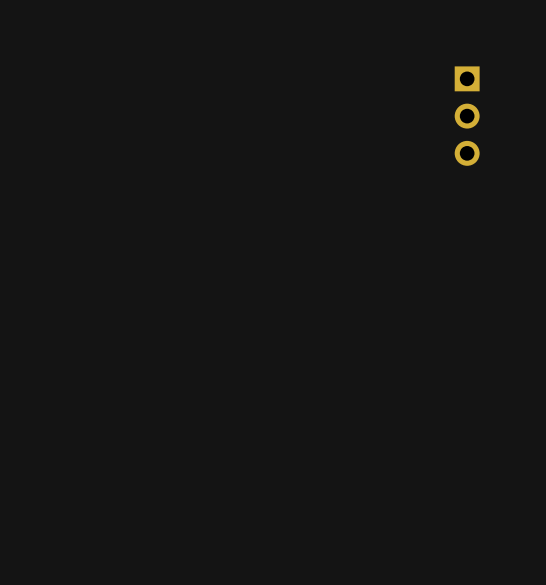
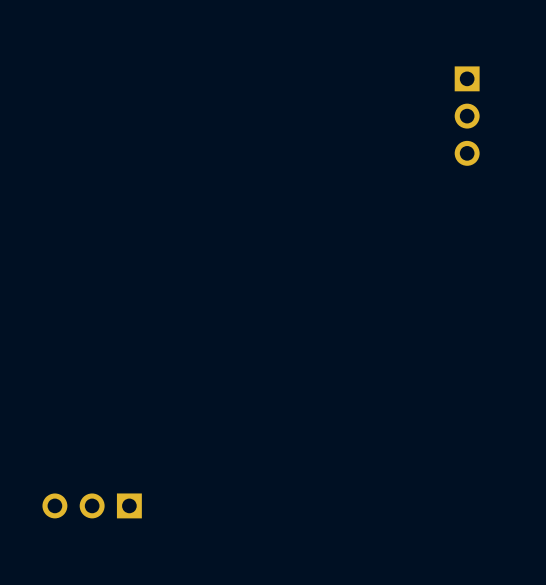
part: none -> (92, 505)

